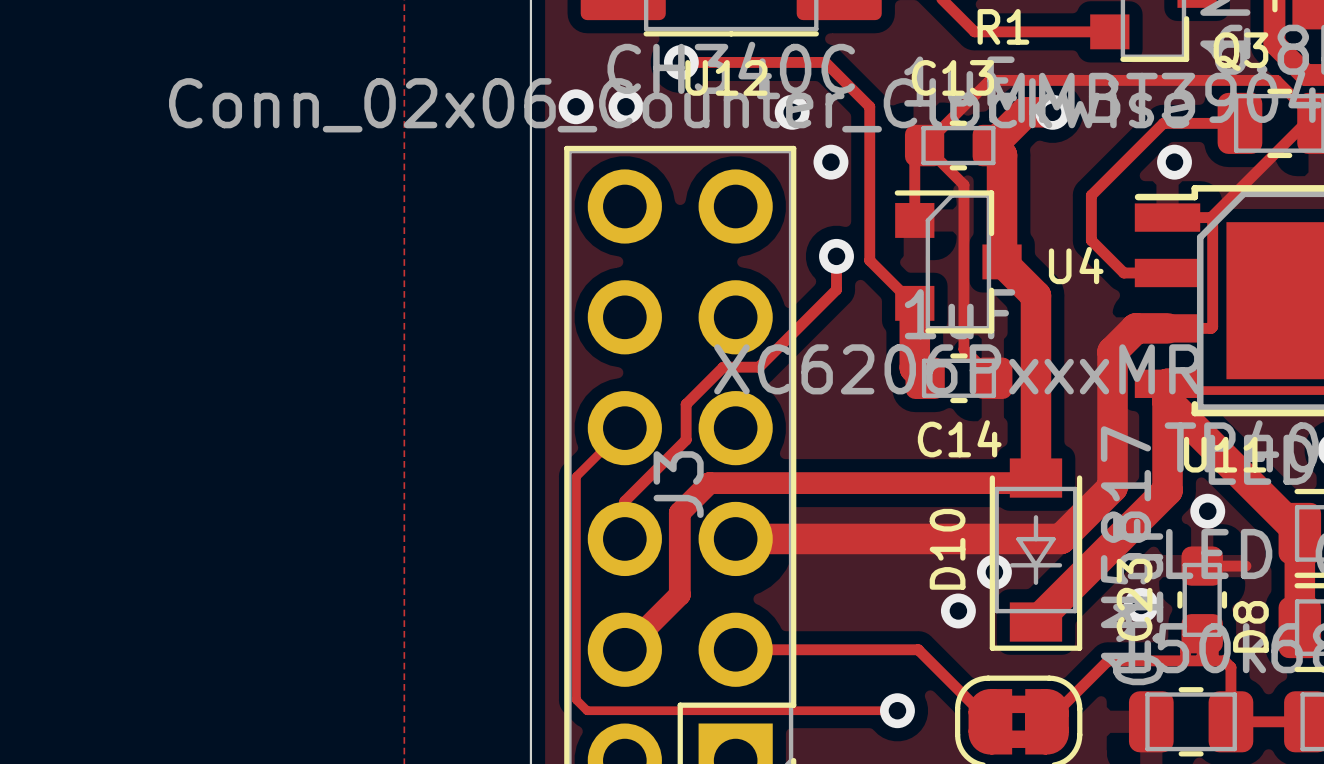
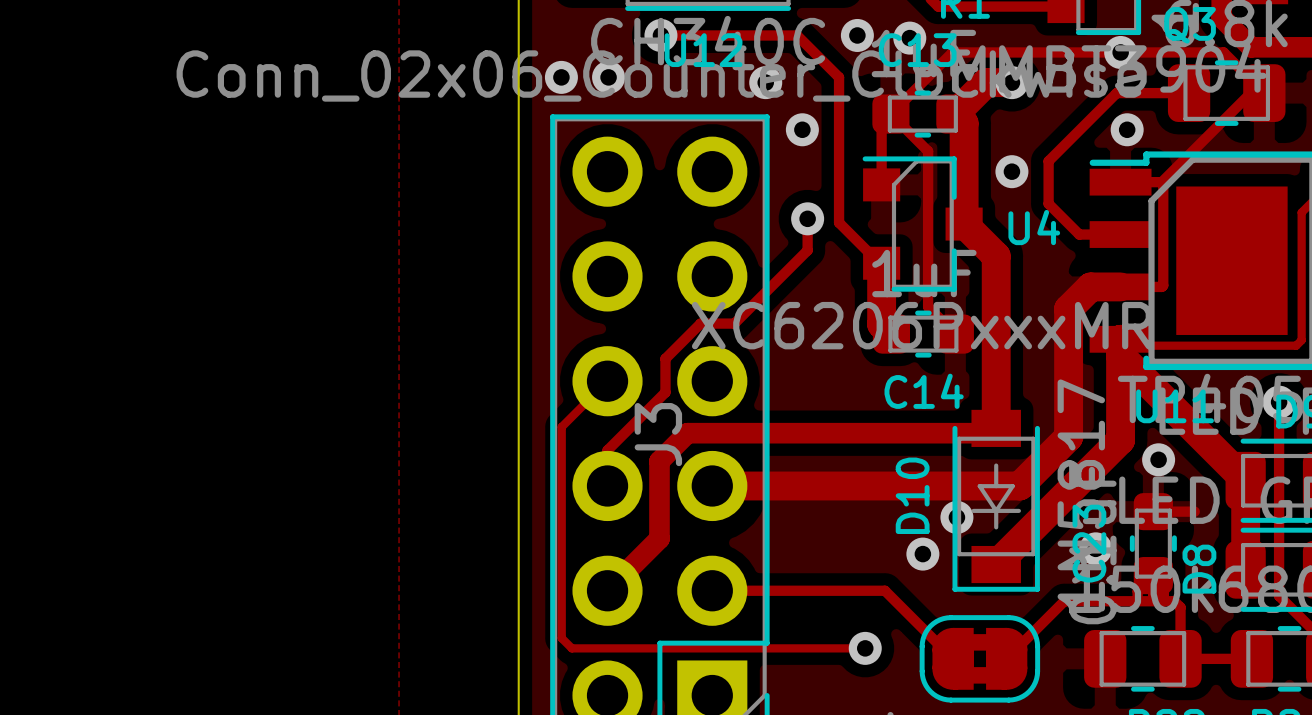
via: none -> (857, 35)
via: none -> (909, 38)
via: none -> (1120, 52)
via: none -> (1011, 171)

